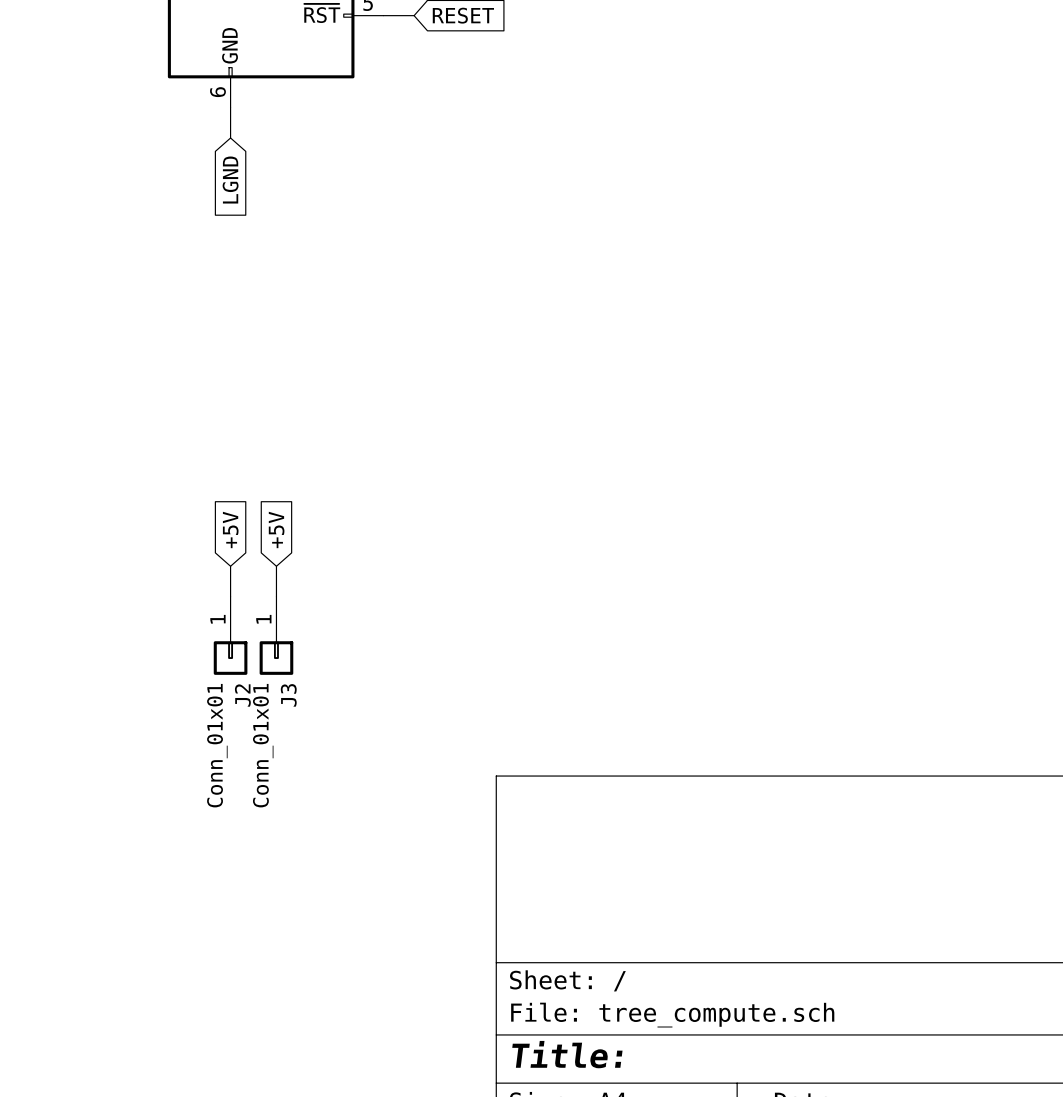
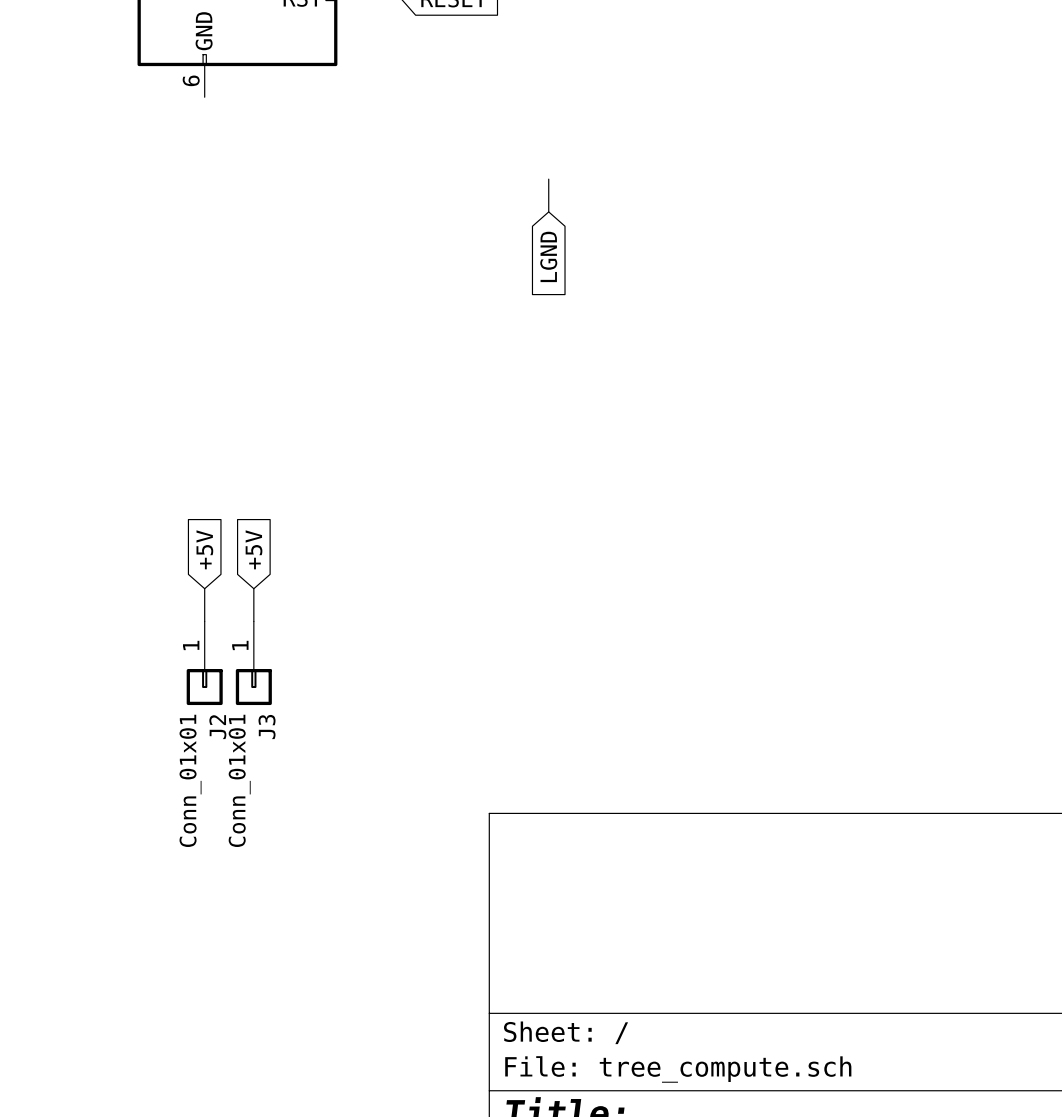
wire: (230, 107) (230, 138) -> none
global label: LGND (230, 180) -> none
wire: none -> (548, 179) (548, 211)
global label: none -> LGND (548, 256)

